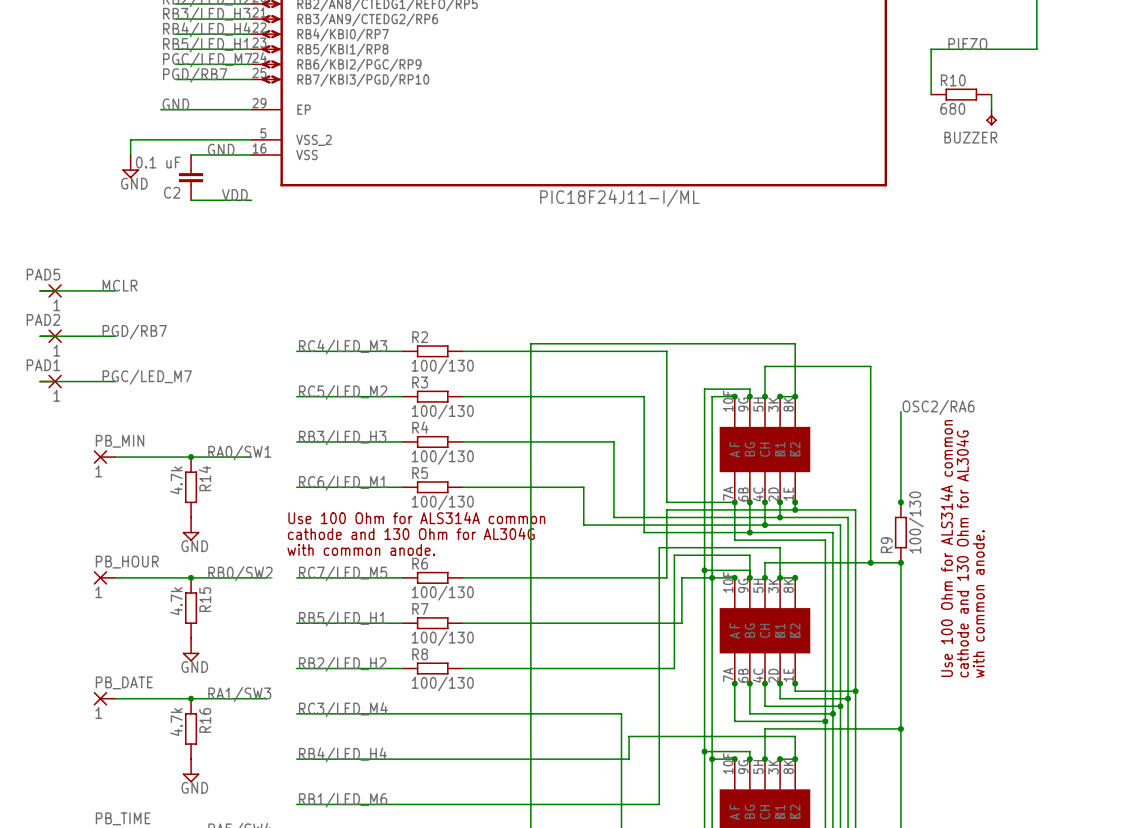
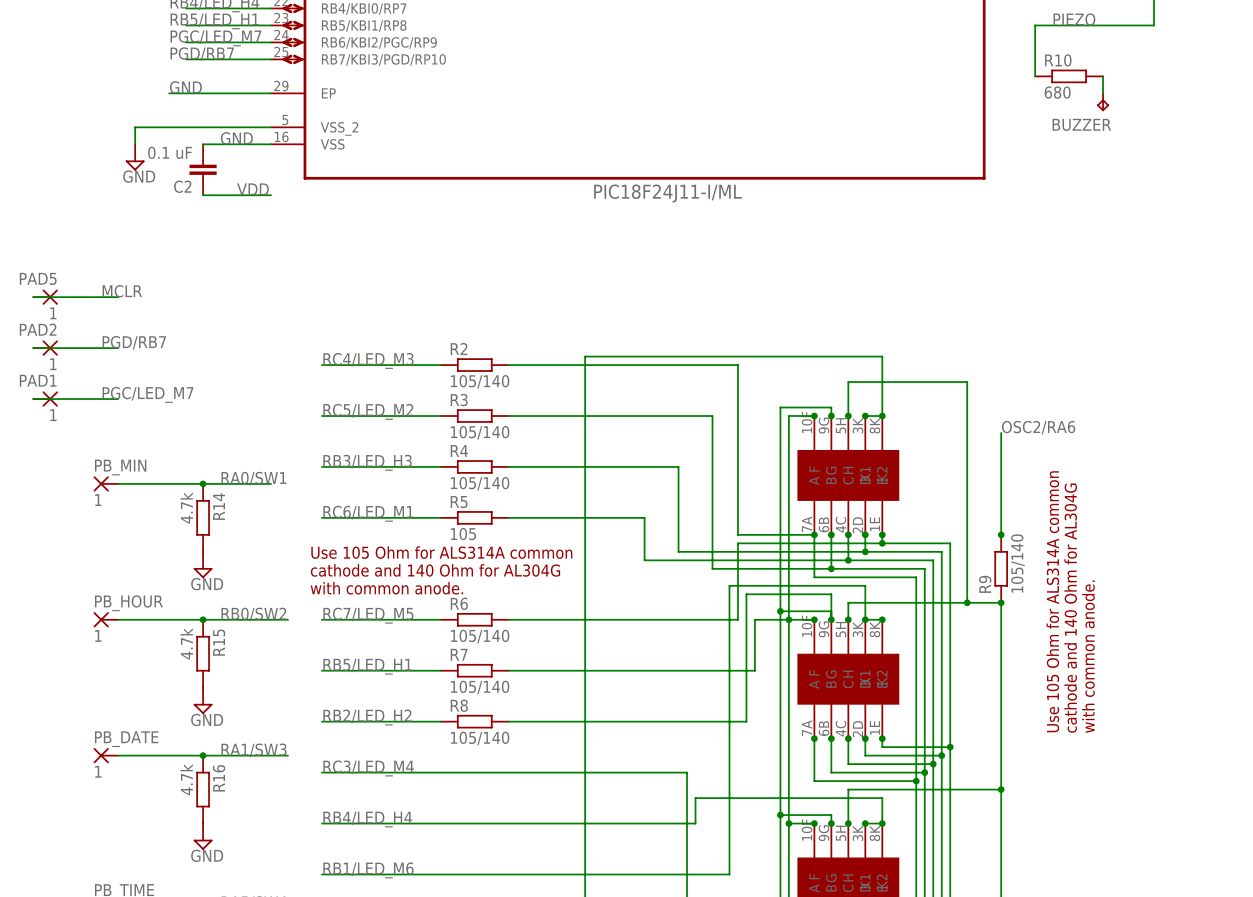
R2 value: 100/130 (442, 366) -> 105/140 (480, 381)
R3 value: 100/130 (442, 412) -> 105/140 (480, 432)
R4 value: 100/130 (442, 457) -> 105/140 (480, 483)
R5 value: 100/130 (442, 502) -> 105 (463, 534)
text: Use 100 Ohm for ALS314A common (416, 517) -> Use 105 Ohm for ALS314A common (441, 552)
R9 value: 100/130 (916, 522) -> 105/140 (1017, 563)
text: cathode and 130 Ohm for AL304G (411, 533) -> cathode and 140 Ohm for AL304G (435, 570)
text: Use 100 Ohm for ALS314A common (946, 548) -> Use 105 Ohm for ALS314A common (1052, 601)
text: cathode and 130 Ohm for AL304G (962, 553) -> cathode and 140 Ohm for AL304G (1070, 608)
R6 value: 100/130 (442, 593) -> 105/140 (480, 636)
R7 value: 100/130 (442, 638) -> 105/140 (480, 687)
R8 value: 100/130 (442, 683) -> 105/140 (480, 738)

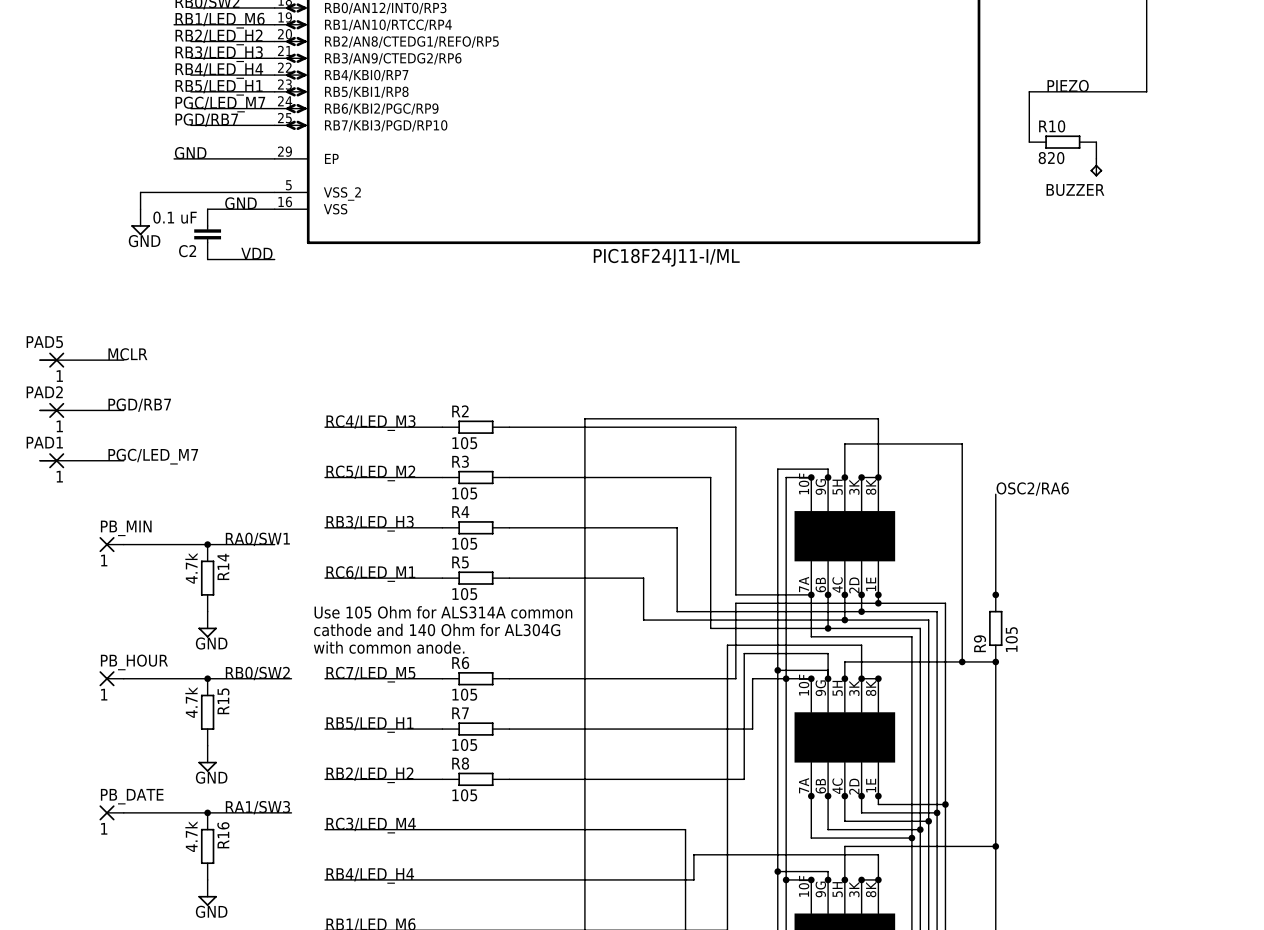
R10 value: 680 (1057, 92) -> 820 (1051, 158)
R2 value: 105/140 (480, 381) -> 105 (464, 443)
R3 value: 105/140 (480, 432) -> 105 (464, 493)
R4 value: 105/140 (480, 483) -> 105 (464, 543)
R9 value: 105/140 (1017, 563) -> 105 (1011, 639)
text: Use 105 Ohm for ALS314A common (1052, 601) -> none
text: cathode and 140 Ohm for AL304G (1070, 608) -> none
R6 value: 105/140 (480, 636) -> 105 (464, 694)
text: with common anode. (1088, 656) -> none
R7 value: 105/140 (480, 687) -> 105 (464, 744)
R8 value: 105/140 (480, 738) -> 105 (464, 795)

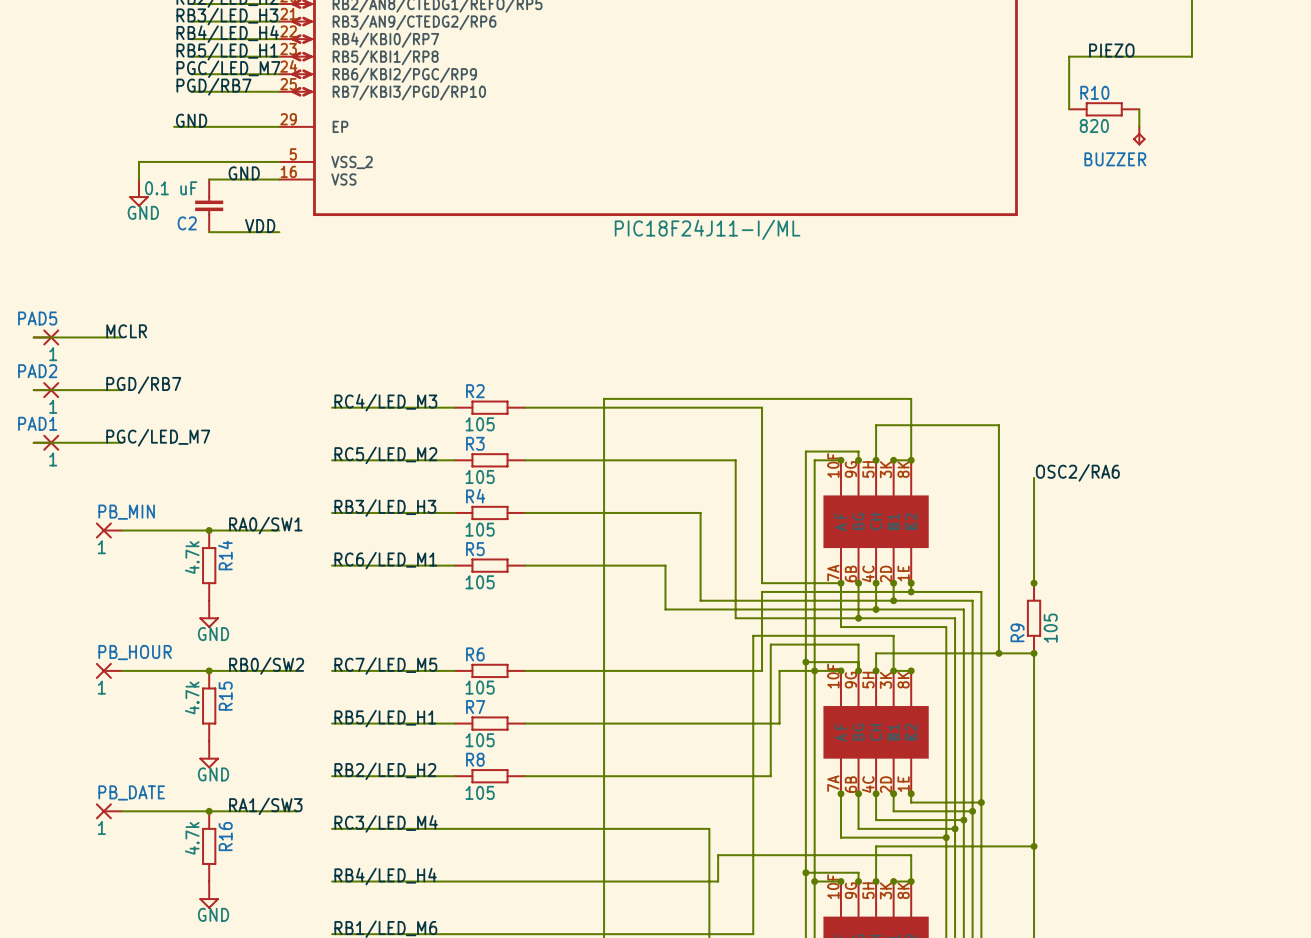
text: Use 105 Ohm for ALS314A common (443, 612) -> none
text: cathode and 140 Ohm for AL304G (437, 629) -> none
text: with common anode. (389, 647) -> none

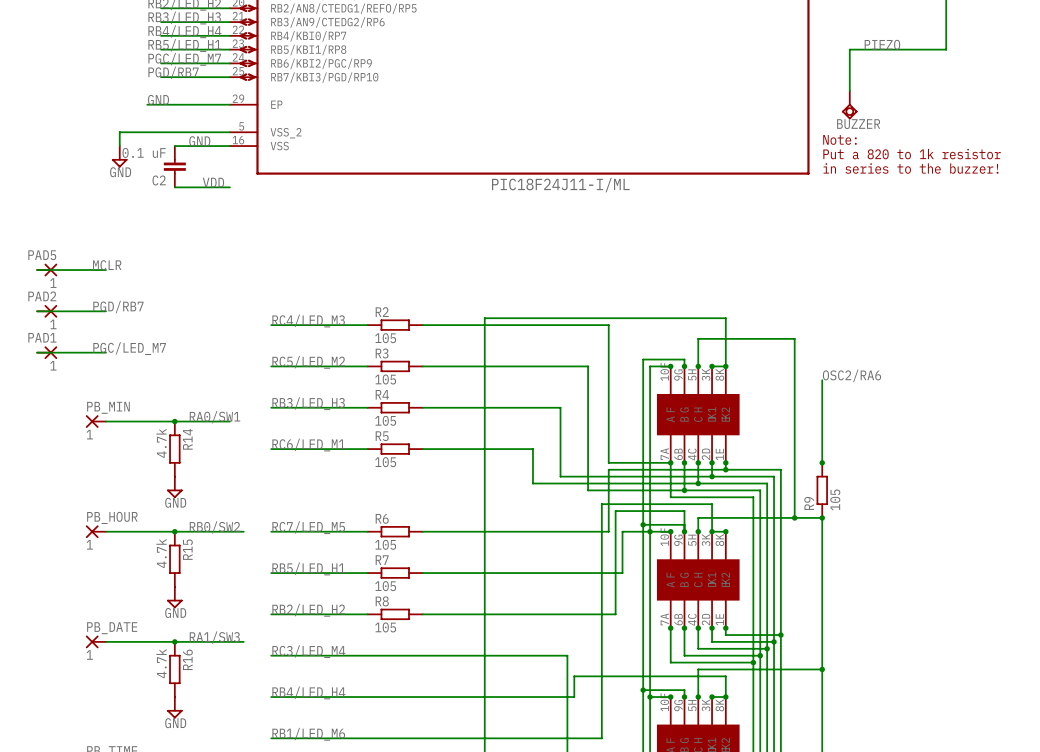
R10: 820 (1104, 109) -> none
wire: (1139, 109) (1139, 126) -> none
BUZZER: none -> (849, 104)
BUZZER: (1139, 136) -> none
text: none -> Note: (839, 139)
text: none -> Put a 820 to 1k resistor (912, 154)
text: none -> in series to the buzzer! (911, 168)

